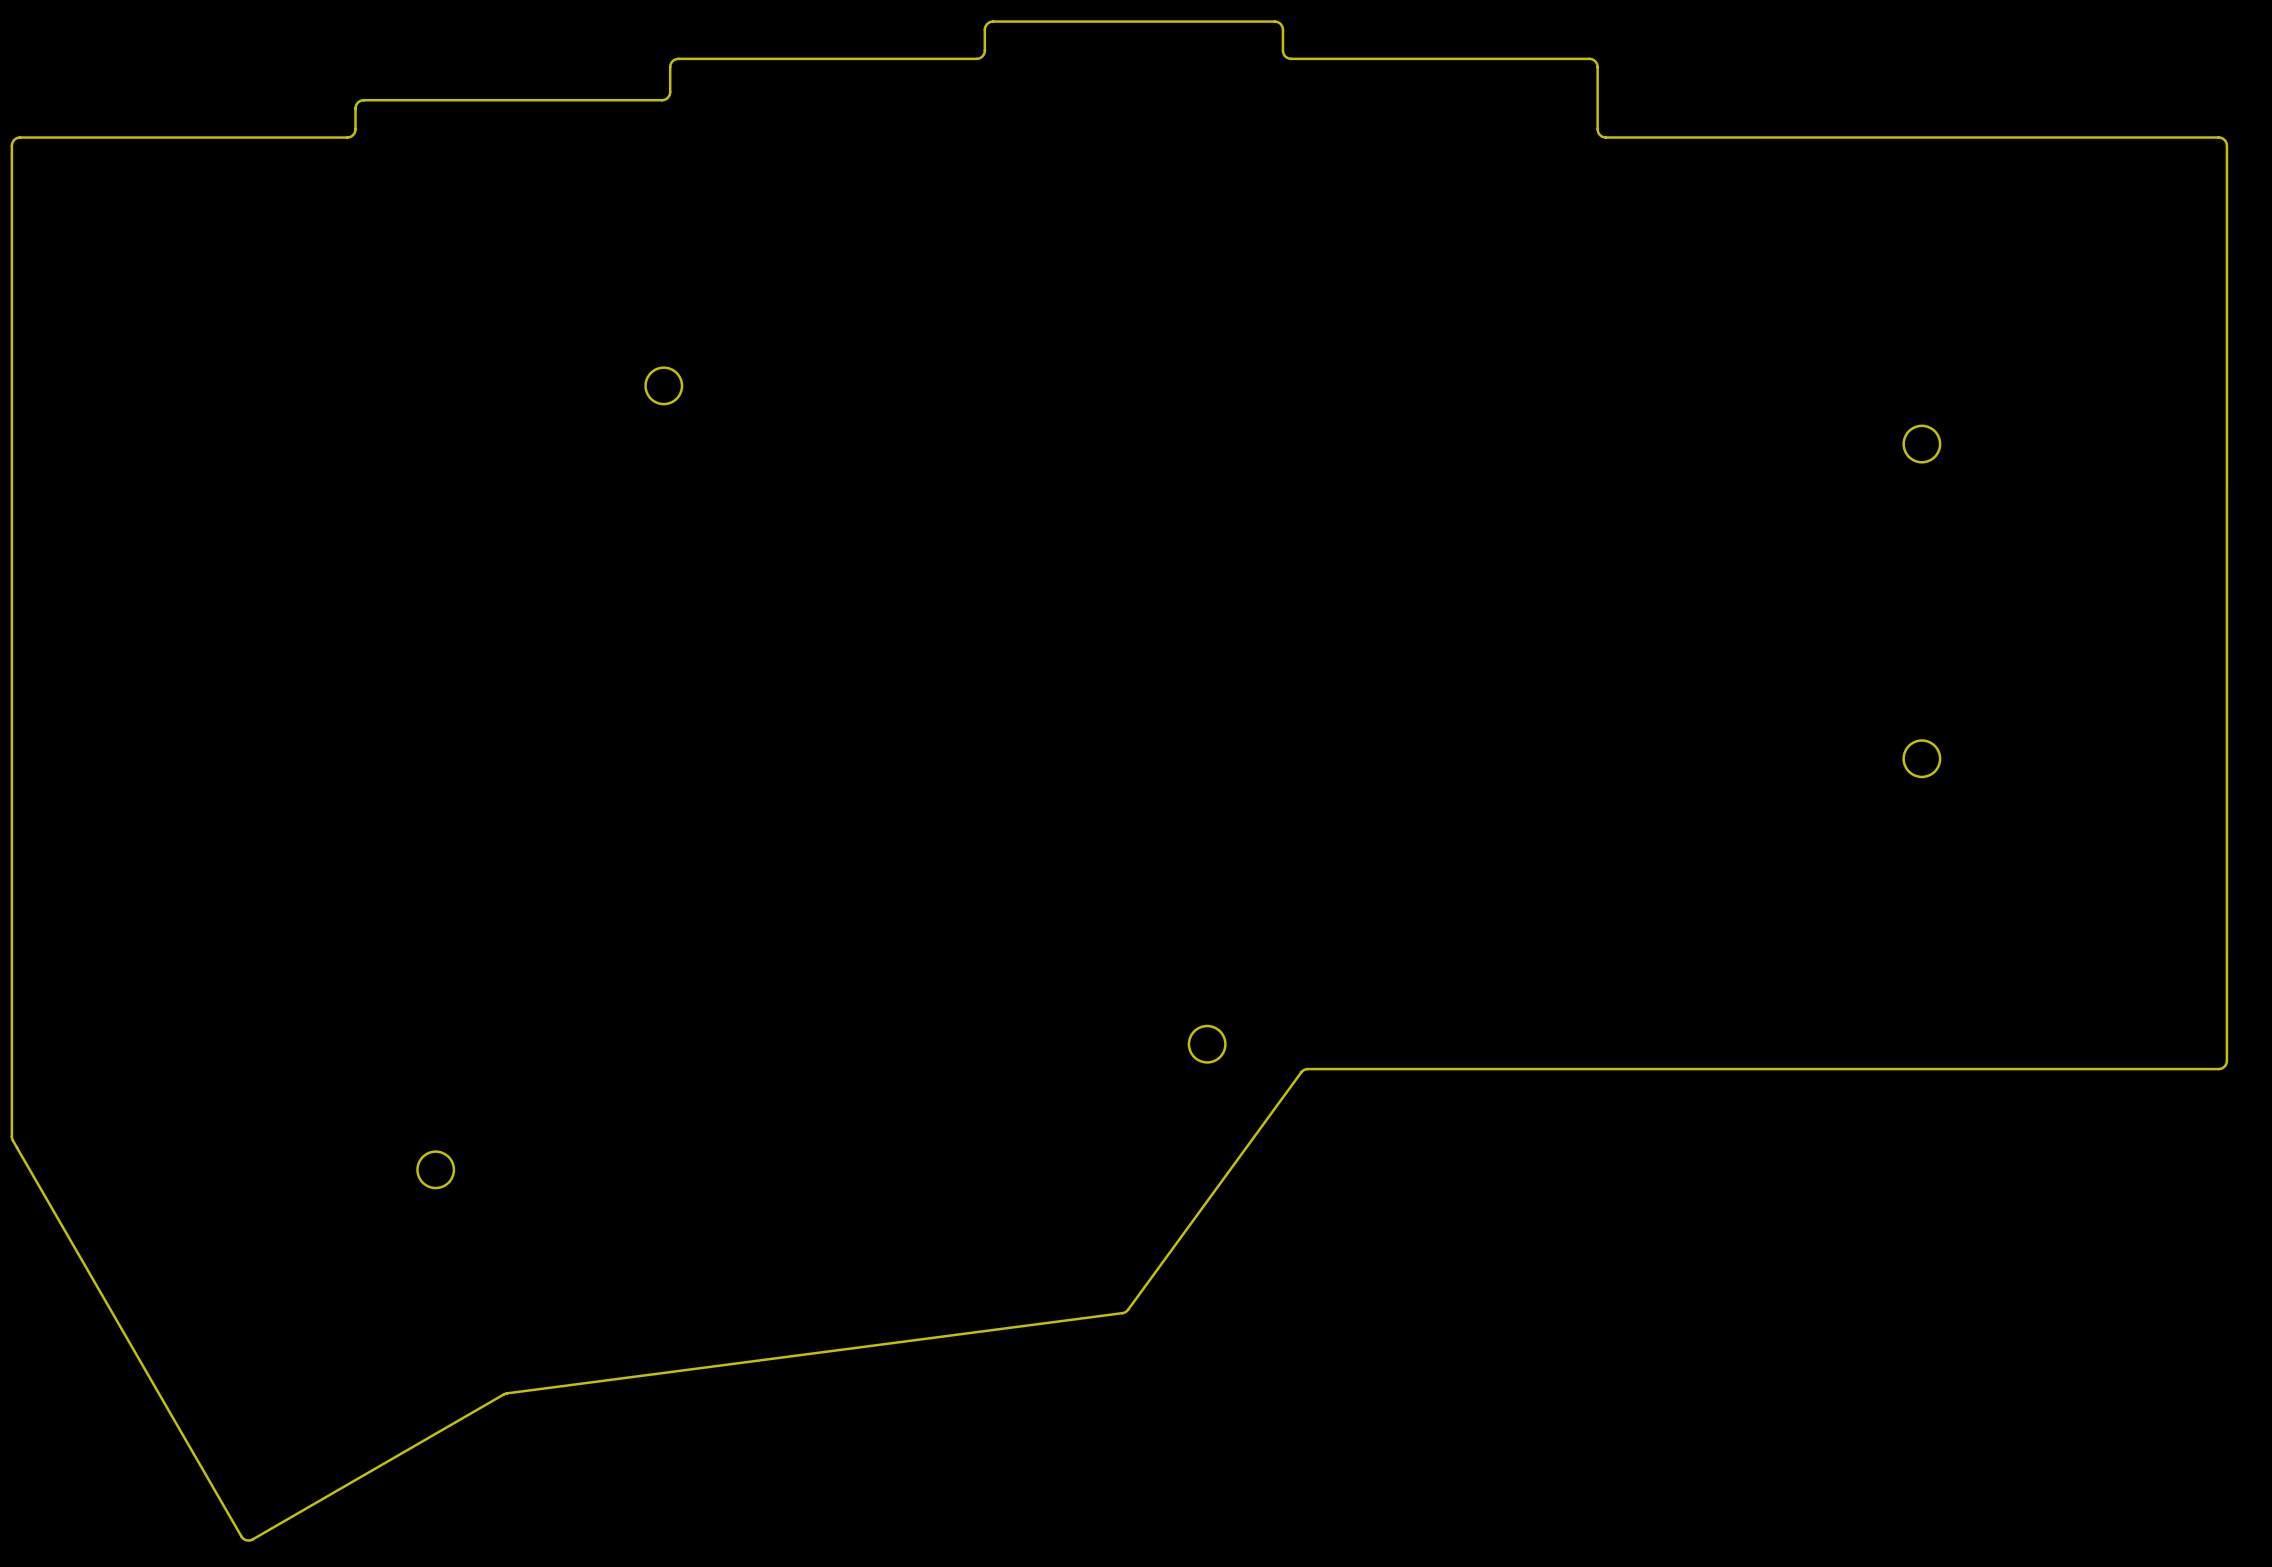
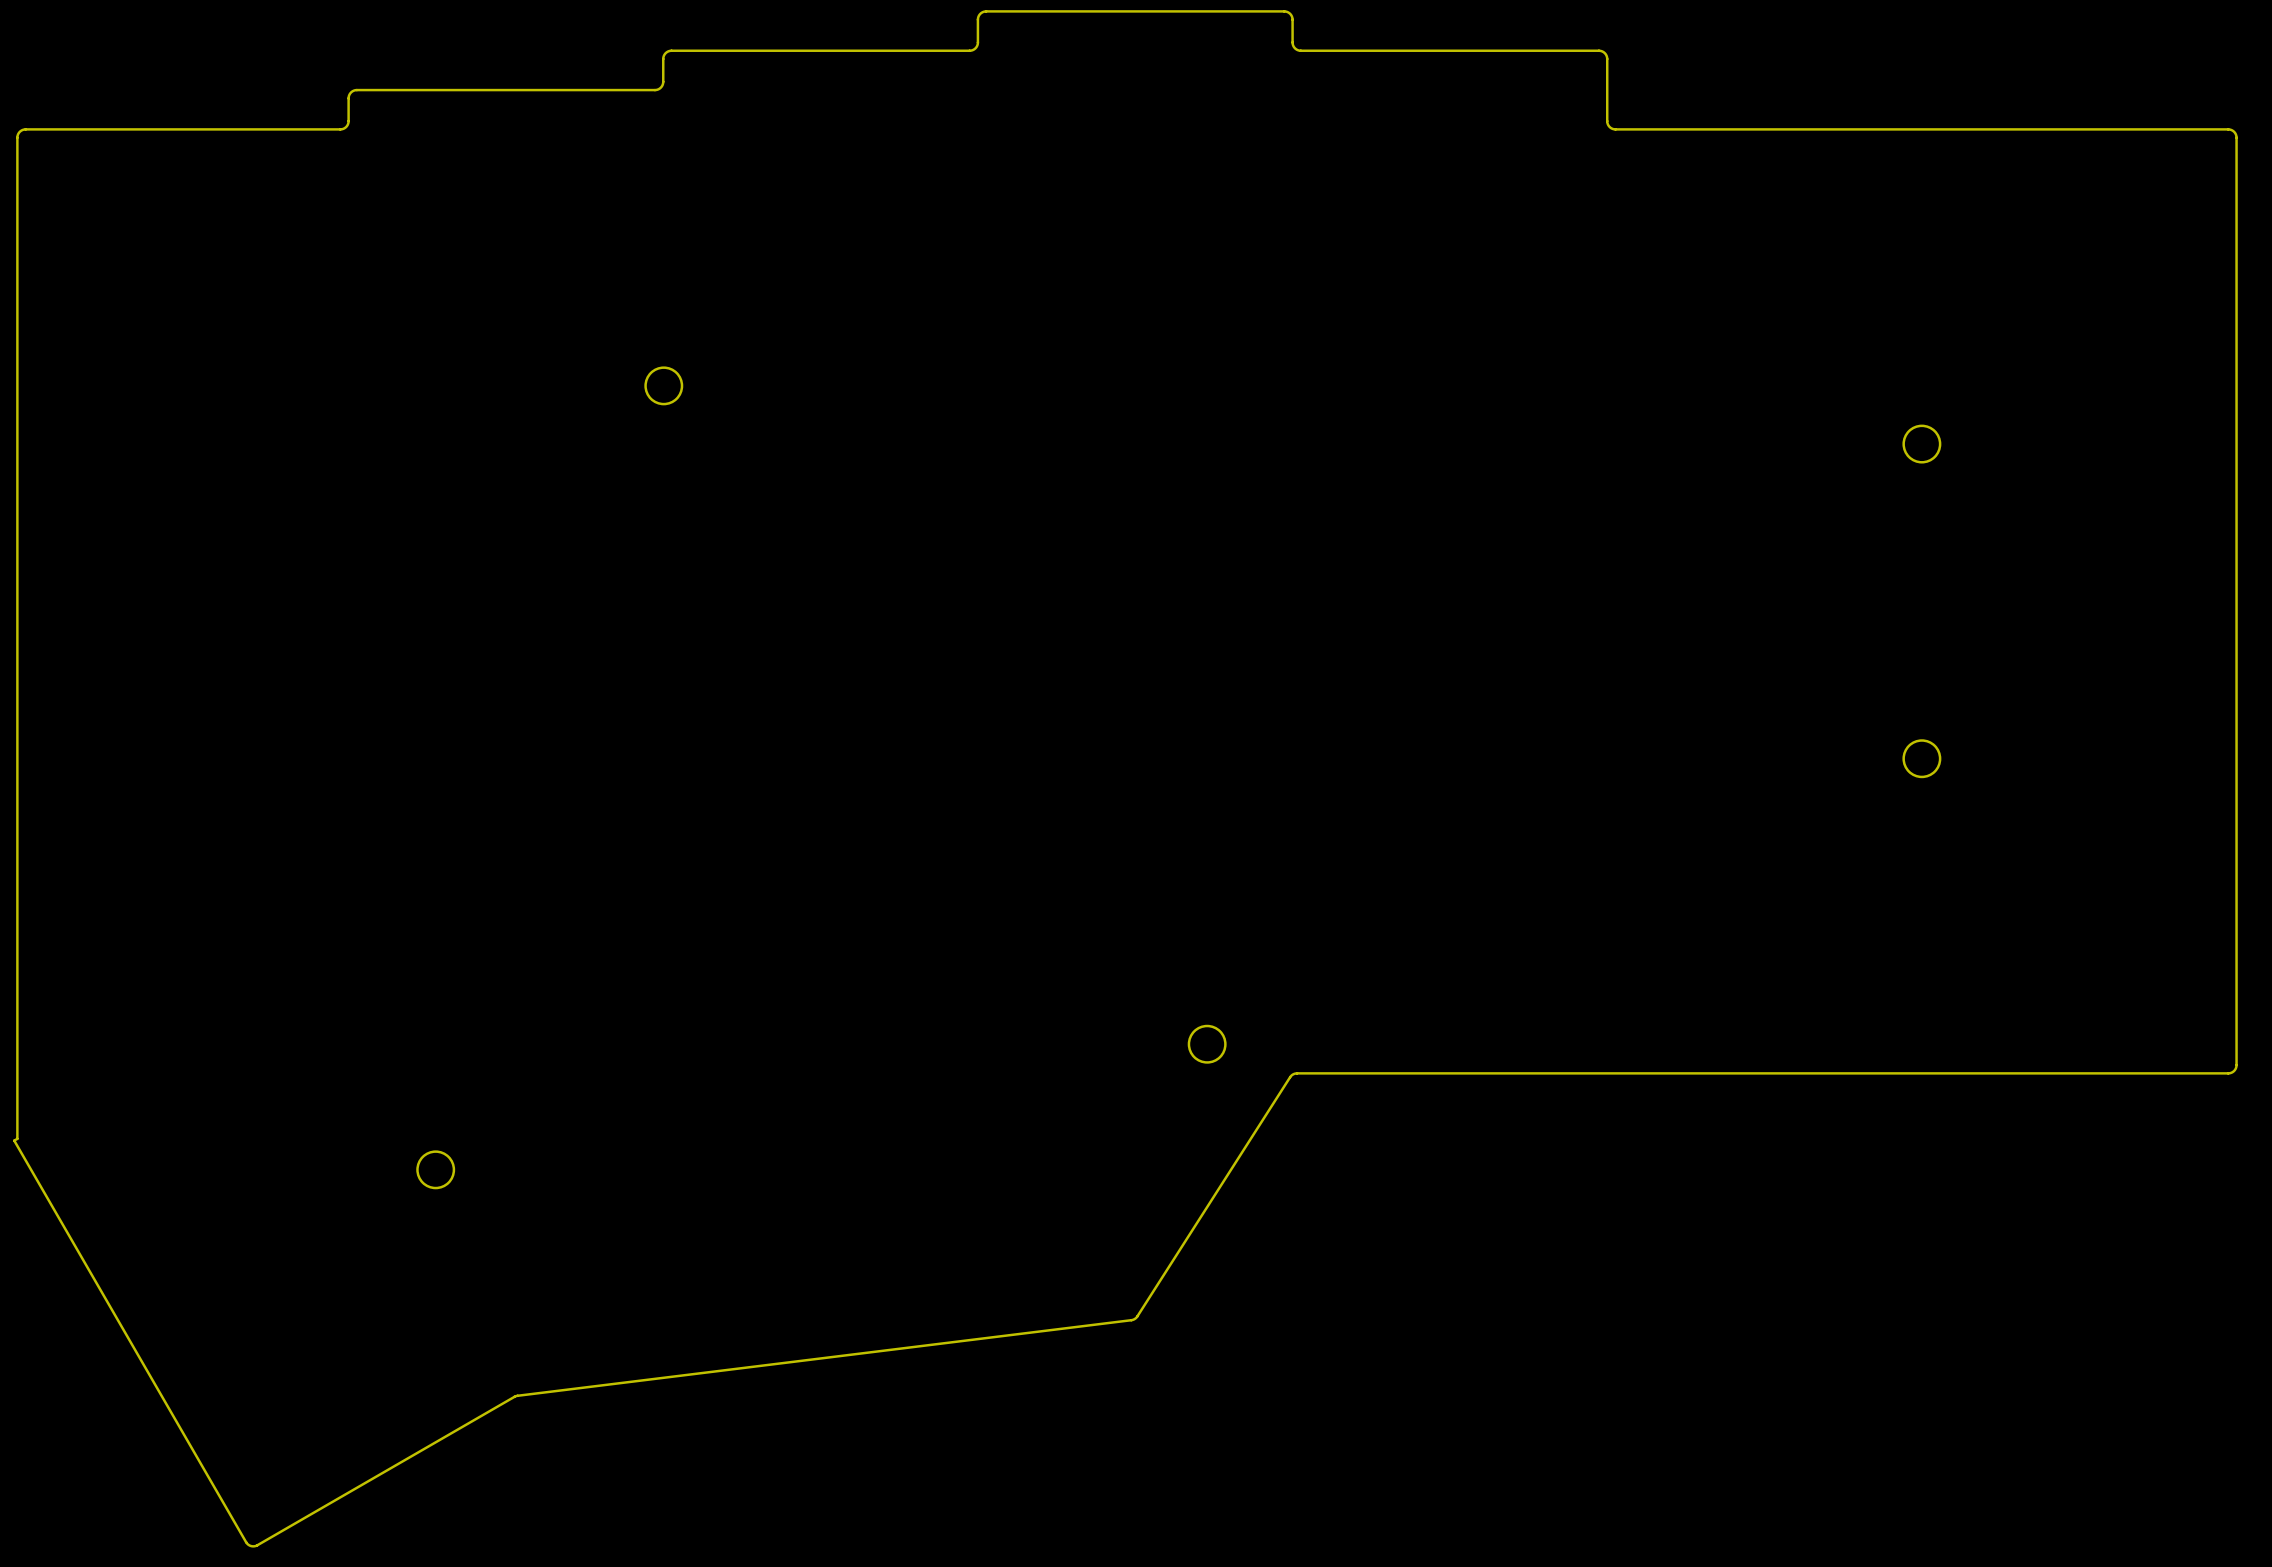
board edge: (1274, 21) (992, 21) (985, 27) (984, 53) (976, 58) (677, 58) (670, 64) (670, 93) (664, 99) (362, 100) (356, 105) (355, 131) (348, 137) (20, 137) (13, 140) (11, 145) (11, 1138) (243, 1539) (252, 1539) (506, 1393) (1124, 1312) (1301, 1072) (1305, 1069) (2218, 1069) (2225, 1065) (2226, 1060) (2226, 145) (2224, 139) (2218, 137) (1604, 137) (1600, 135) (1597, 130) (1597, 66) (1592, 59) (1290, 58) (1283, 52) (1282, 26) (1274, 21) -> (1284, 11) (1291, 16) (1292, 44) (1299, 50) (1602, 51) (1607, 57) (1607, 122) (1609, 126) (1614, 129) (2228, 129) (2234, 131) (2236, 137) (2236, 1065) (2234, 1070) (2228, 1073) (1295, 1073) (1290, 1077) (1133, 1319) (516, 1395) (257, 1545) (248, 1544) (14, 1140) (17, 1138) (17, 137) (19, 132) (25, 129) (341, 129) (347, 124) (348, 96) (355, 90) (656, 90) (662, 84) (663, 56) (670, 50) (970, 50) (977, 45) (978, 17) (985, 11) (1284, 11)

